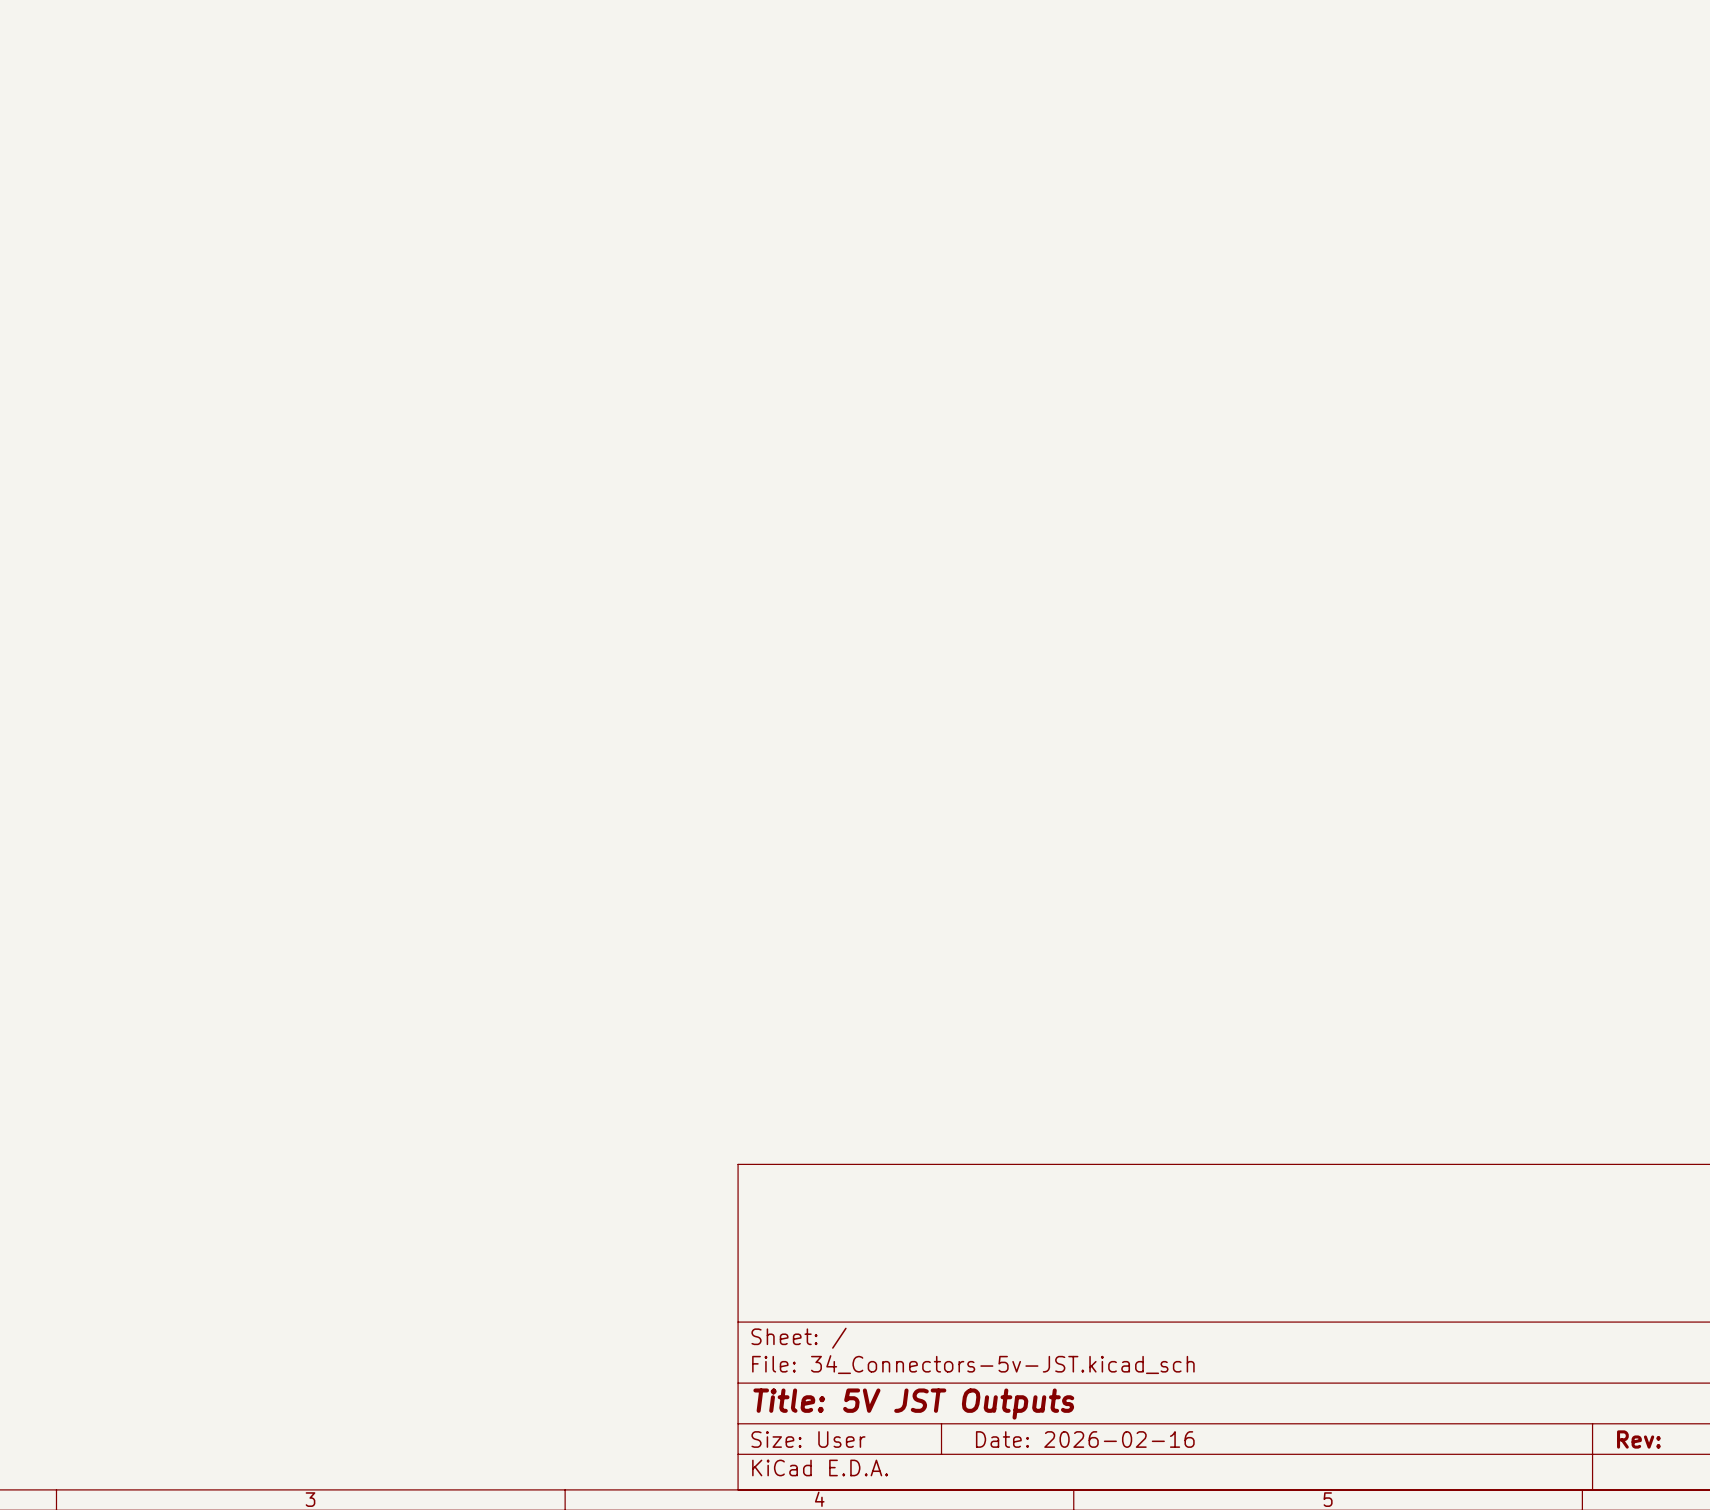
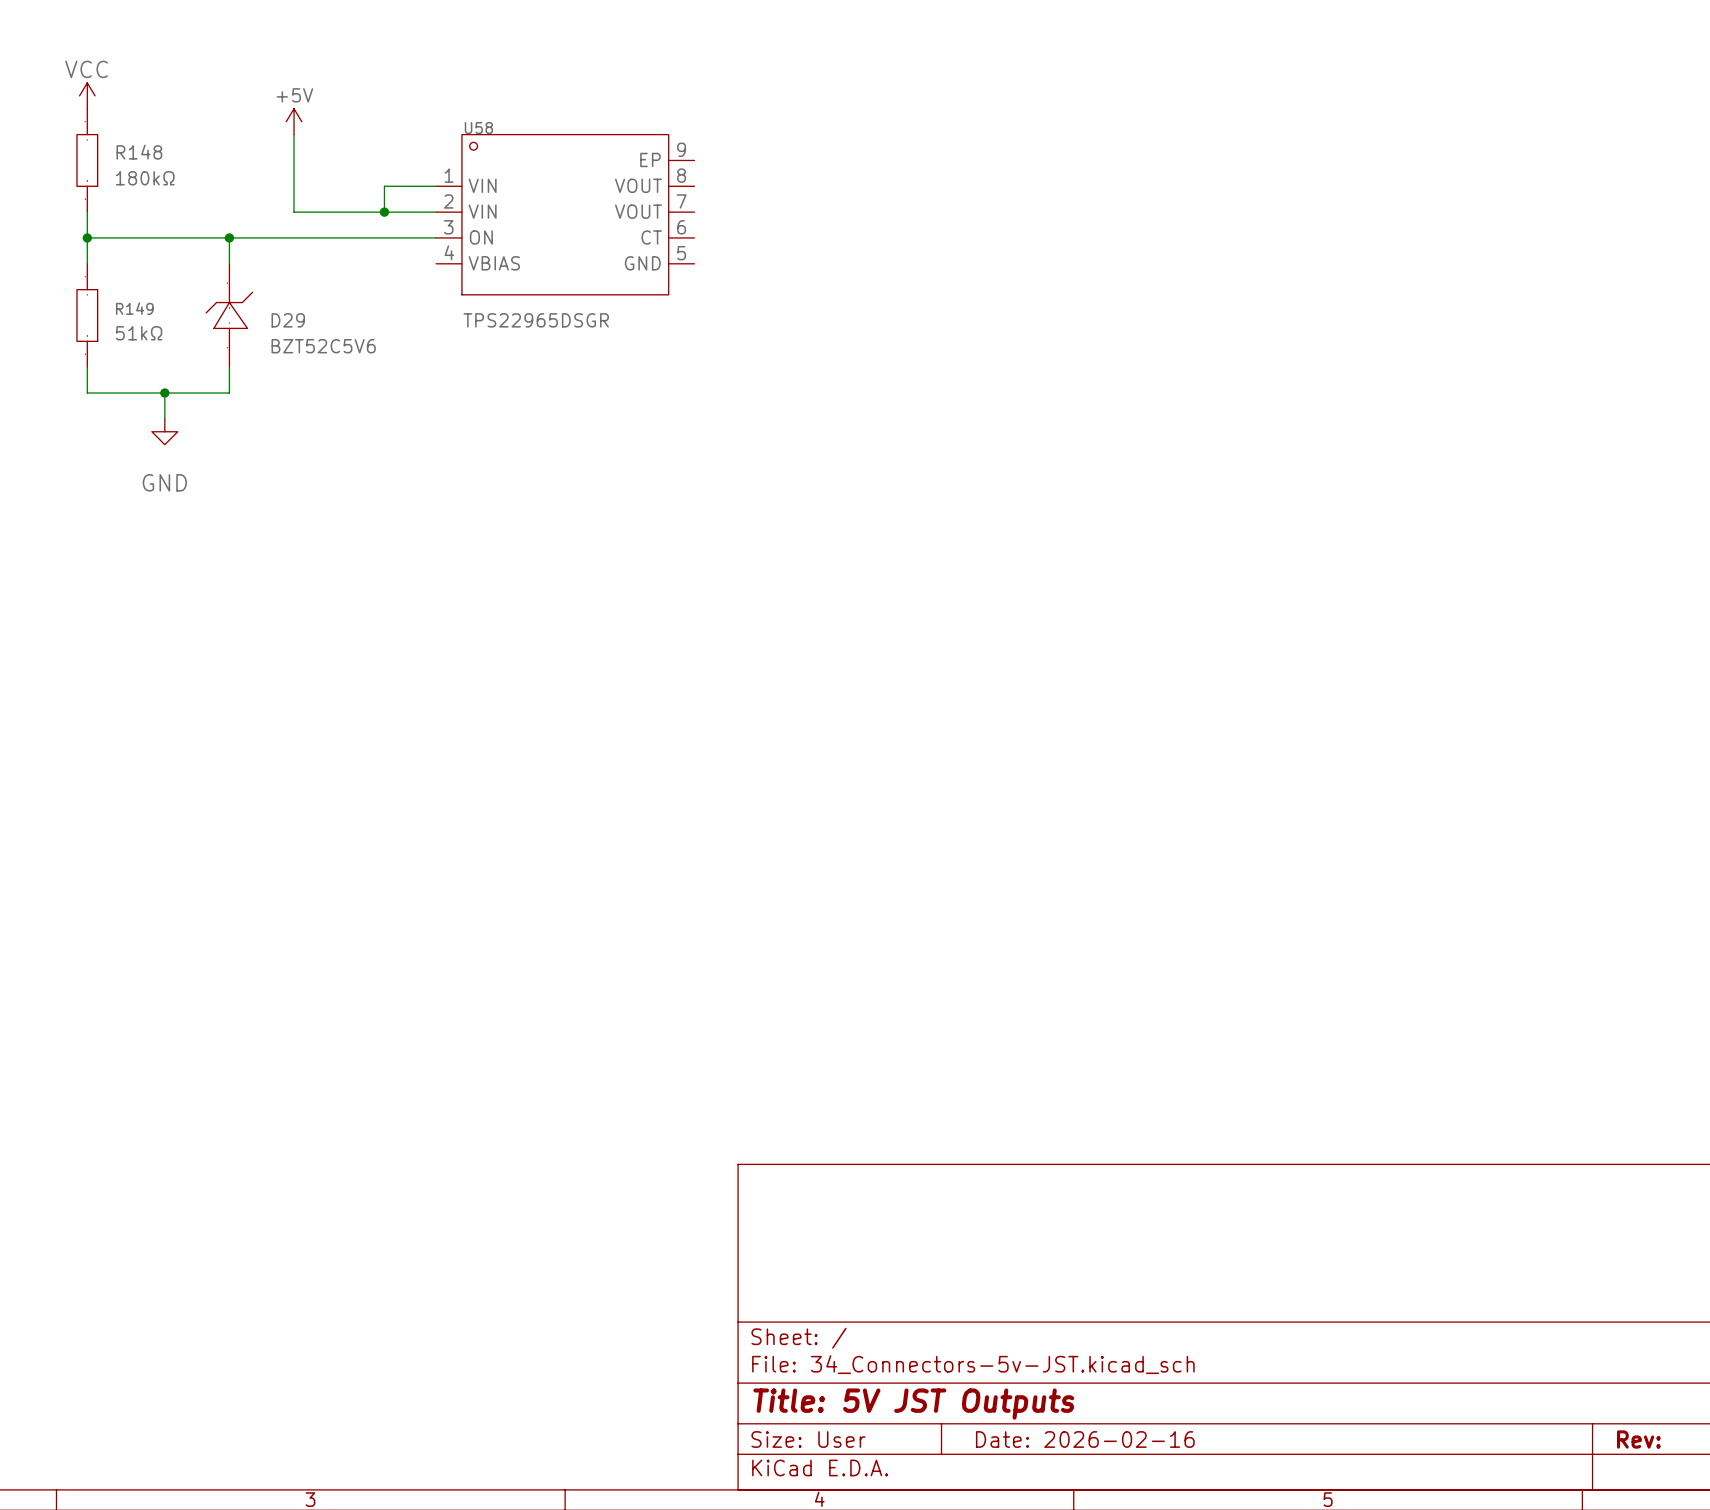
power symbol: none -> VCC (87, 95)
power symbol: none -> +5V (294, 121)
wire: none -> (294, 134) (294, 212) (436, 212)
R148: none -> 180kΩ (87, 160)
wire: none -> (436, 186) (384, 186) (384, 212)
wire: none -> (87, 212) (87, 263)
junction: none -> (384, 212)
U58: none -> TPS22965DSGR (565, 214)
wire: none -> (87, 237) (436, 237)
junction: none -> (87, 237)
wire: none -> (229, 237) (229, 263)
junction: none -> (229, 237)
R149: none -> 51kΩ (87, 315)
D29: none -> BZT52C5V6 (229, 315)
wire: none -> (87, 367) (87, 393) (229, 393) (229, 367)
wire: none -> (164, 393) (164, 418)
junction: none -> (164, 393)
power symbol: none -> GND (164, 431)

